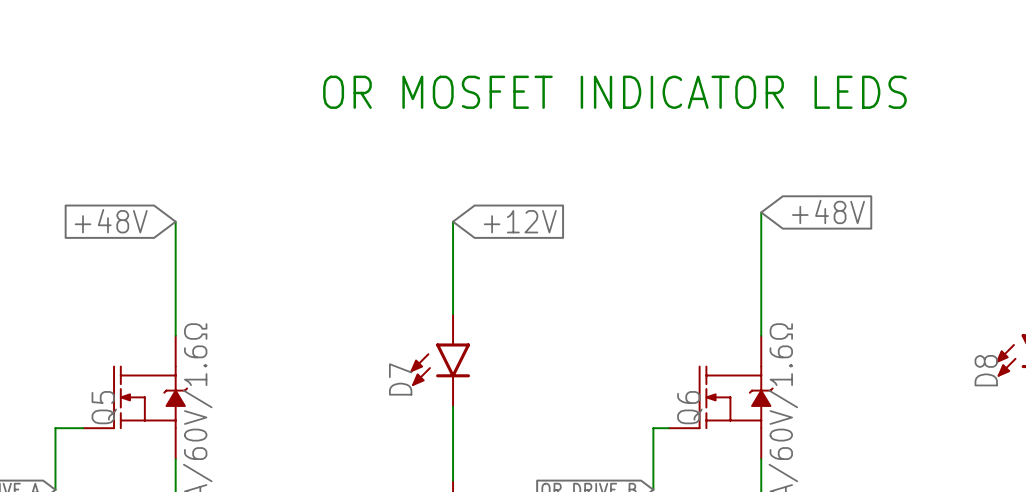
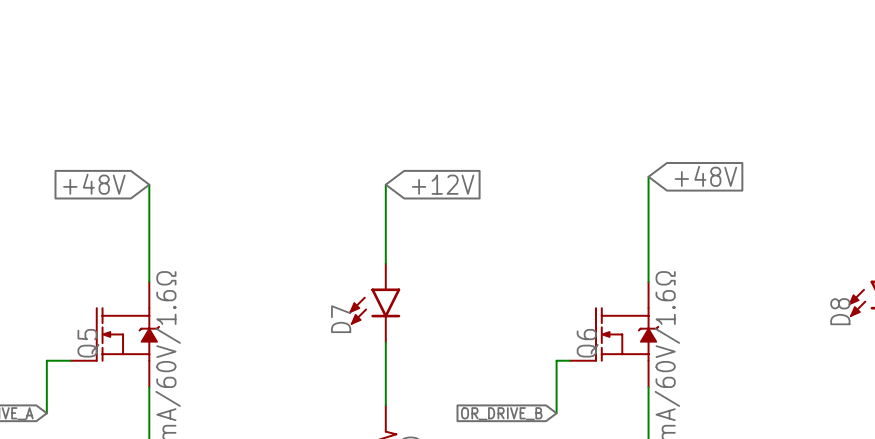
text: OR MOSFET INDICATOR LEDS (614, 92) -> none

